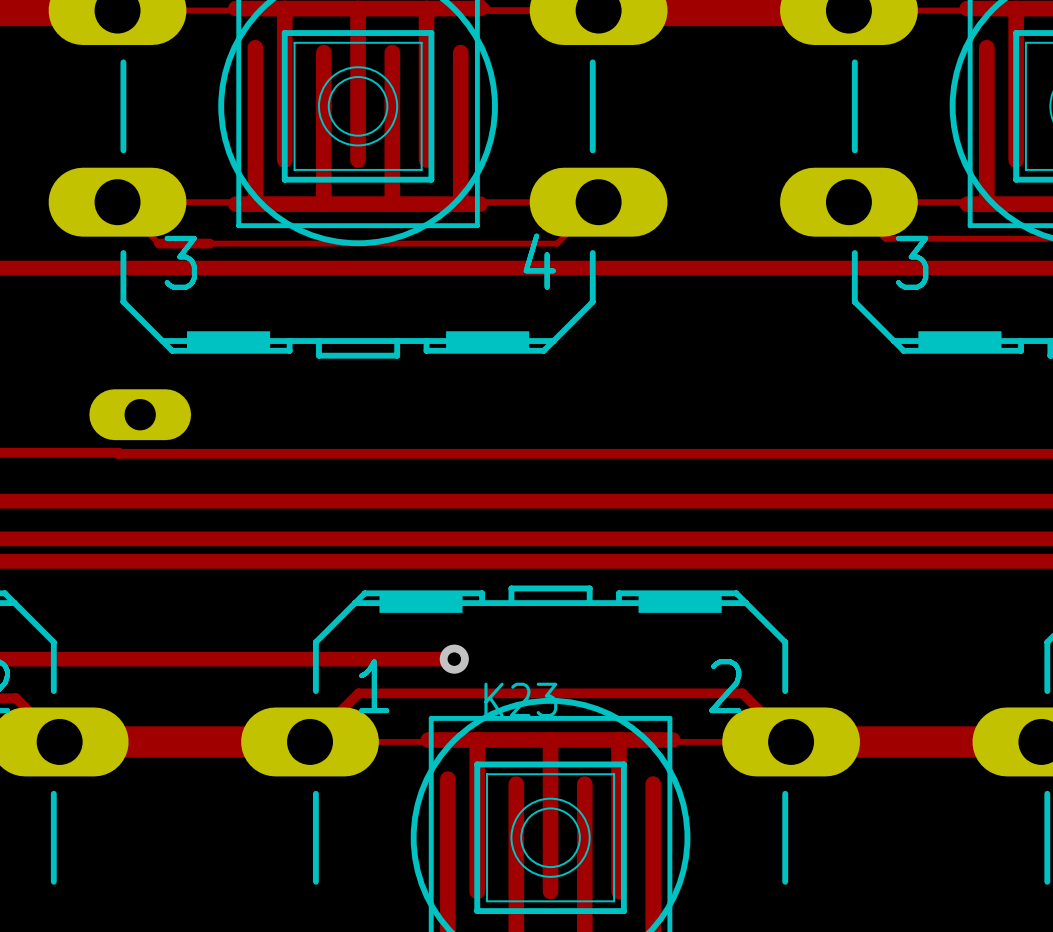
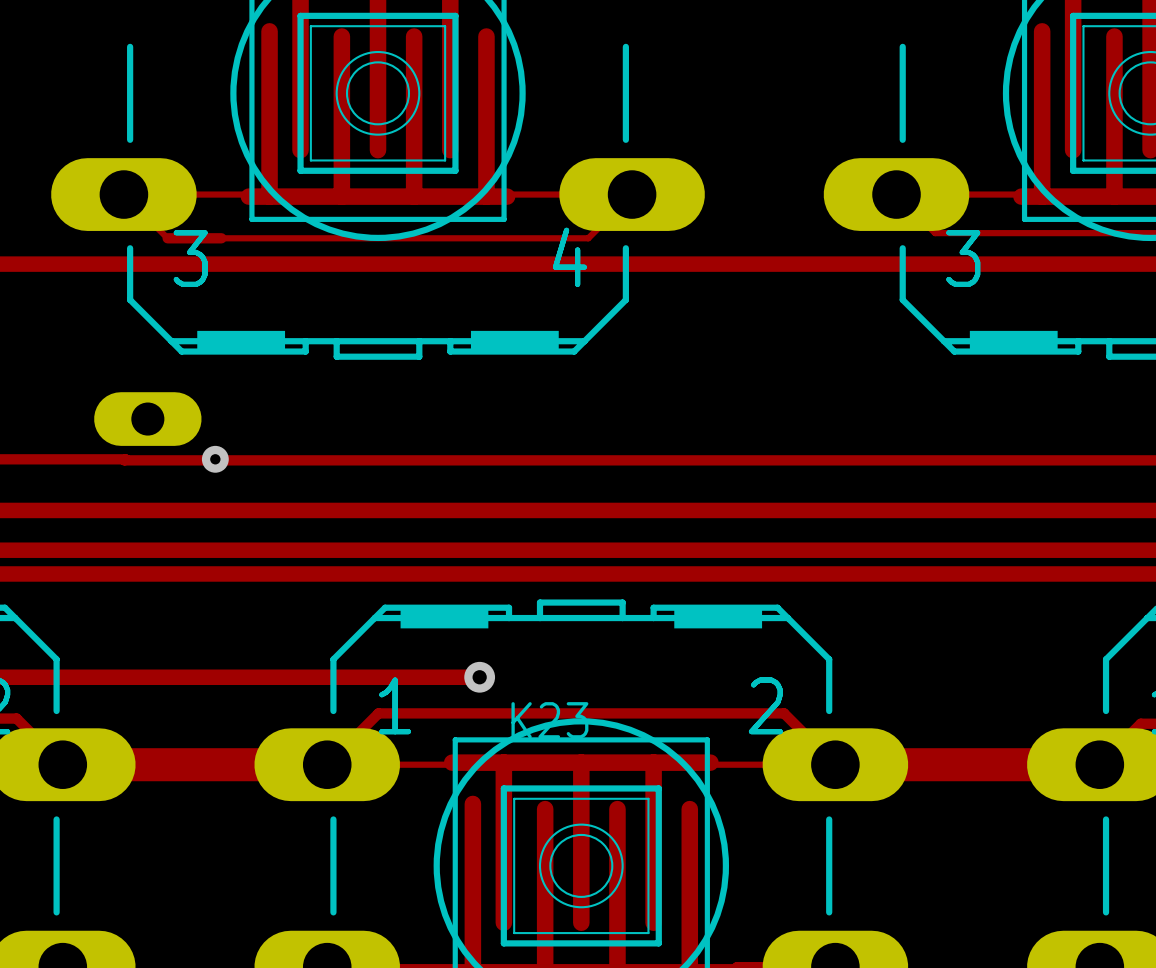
via: none -> (215, 459)

